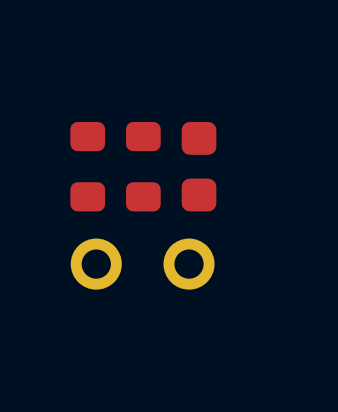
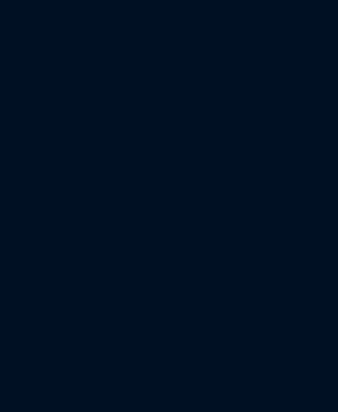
part: (87, 166) -> none
part: (143, 166) -> none
part: (199, 166) -> none
part: (142, 264) -> none

